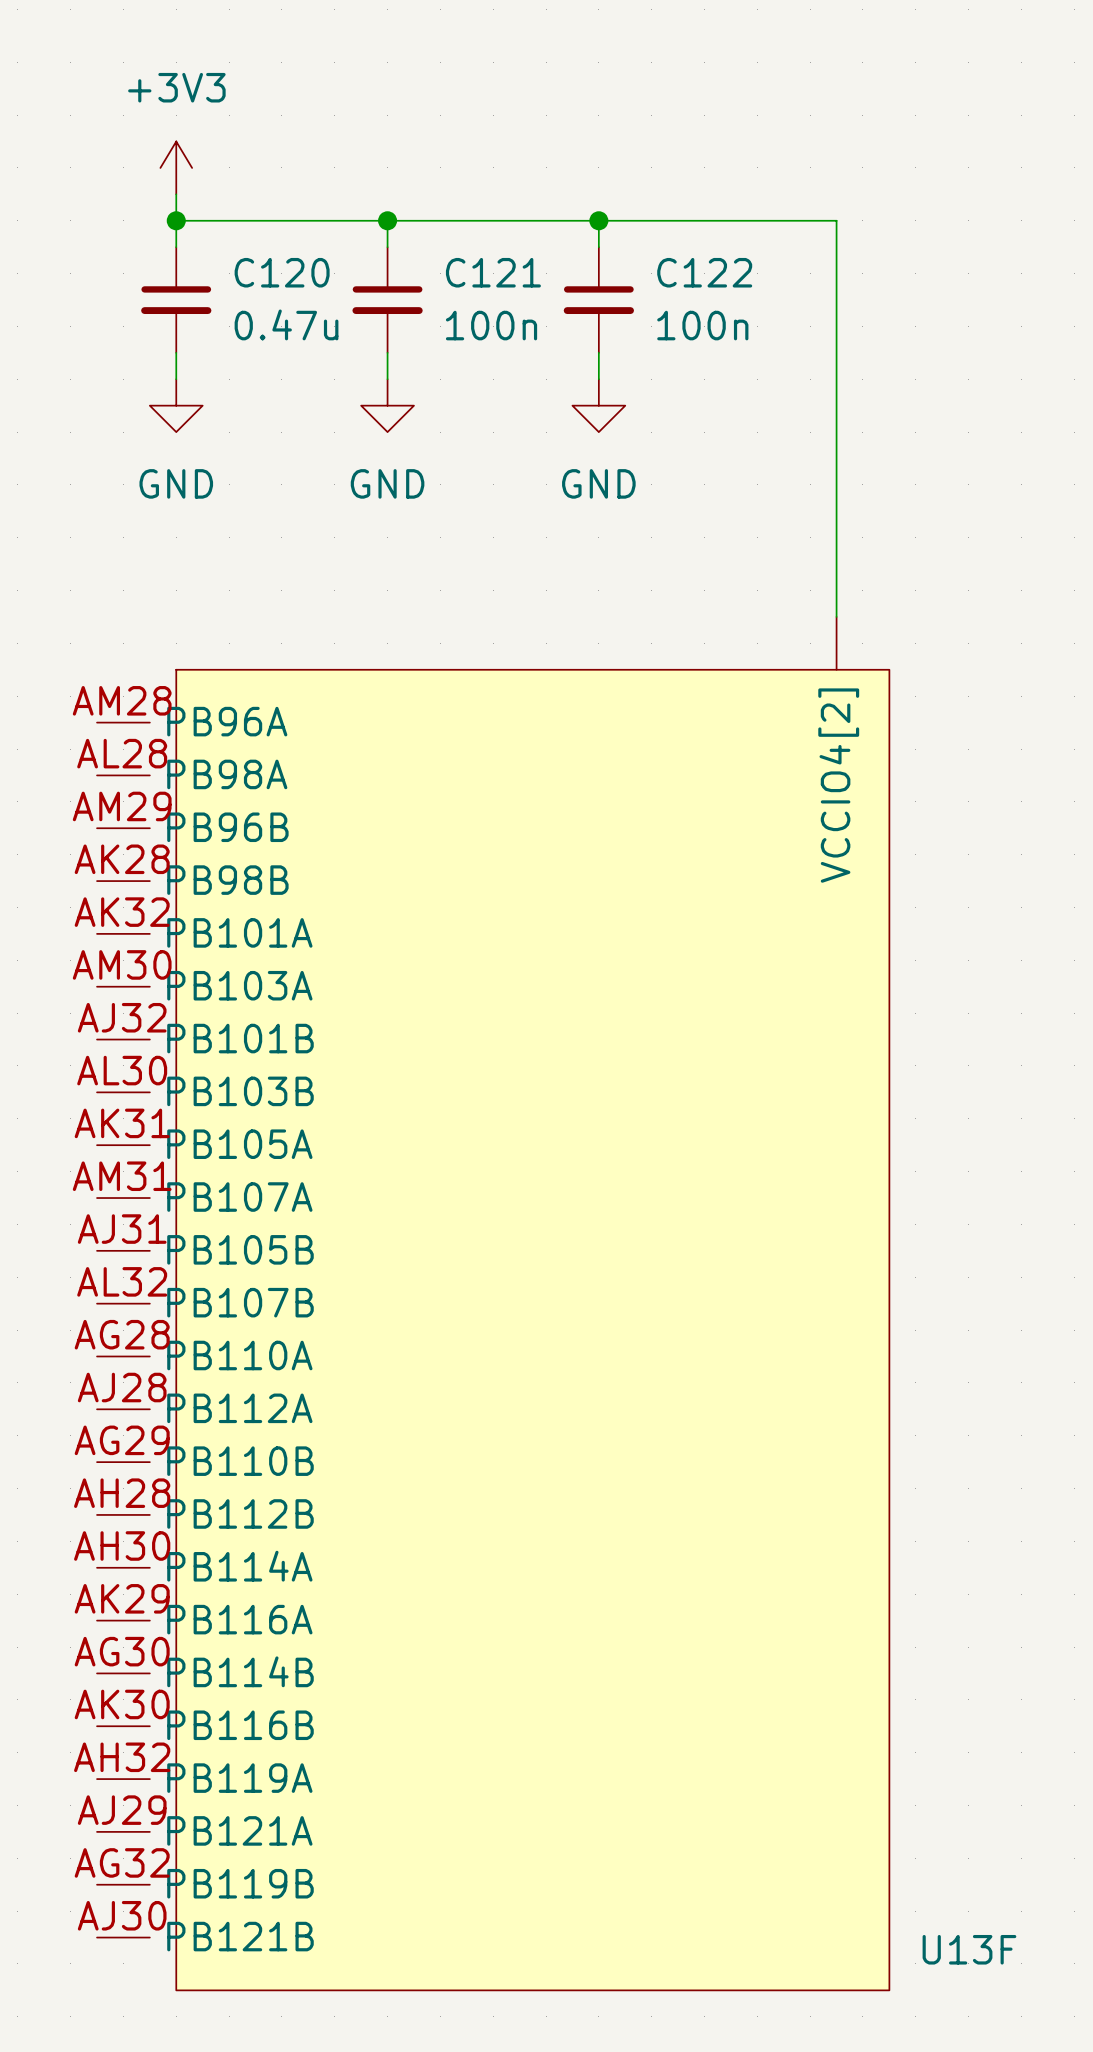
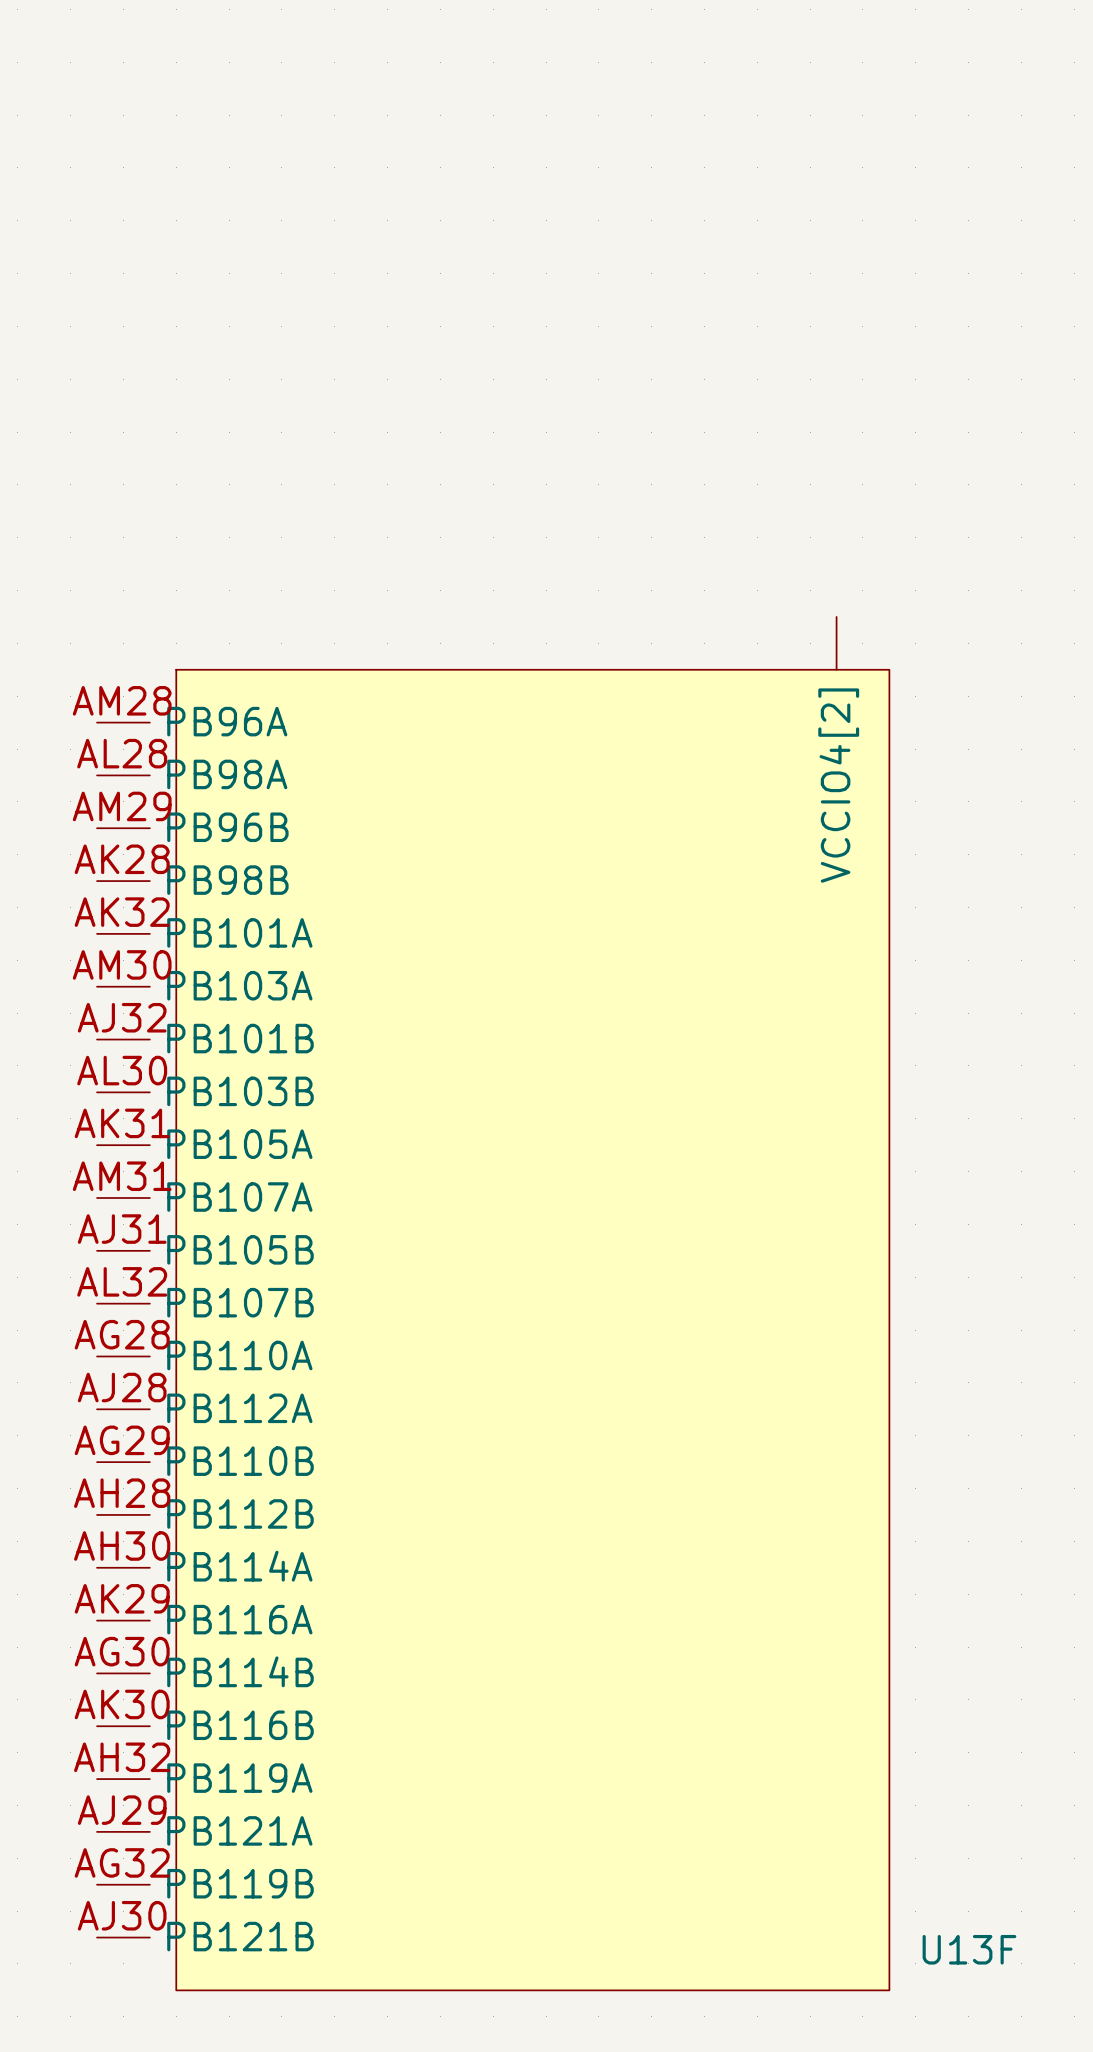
power symbol: +3V3 (176, 167) -> none
wire: (176, 194) (176, 247) -> none
wire: (176, 220) (836, 220) (836, 616) -> none
junction: (176, 220) -> none
wire: (387, 220) (387, 247) -> none
junction: (387, 220) -> none
wire: (598, 220) (598, 247) -> none
junction: (598, 220) -> none
C120: 0.47u (176, 300) -> none
C121: 100n (387, 300) -> none
C122: 100n (598, 300) -> none
wire: (176, 352) (176, 379) -> none
wire: (387, 352) (387, 379) -> none
wire: (598, 352) (598, 379) -> none
power symbol: GND (176, 405) -> none
power symbol: GND (387, 405) -> none
power symbol: GND (598, 405) -> none

